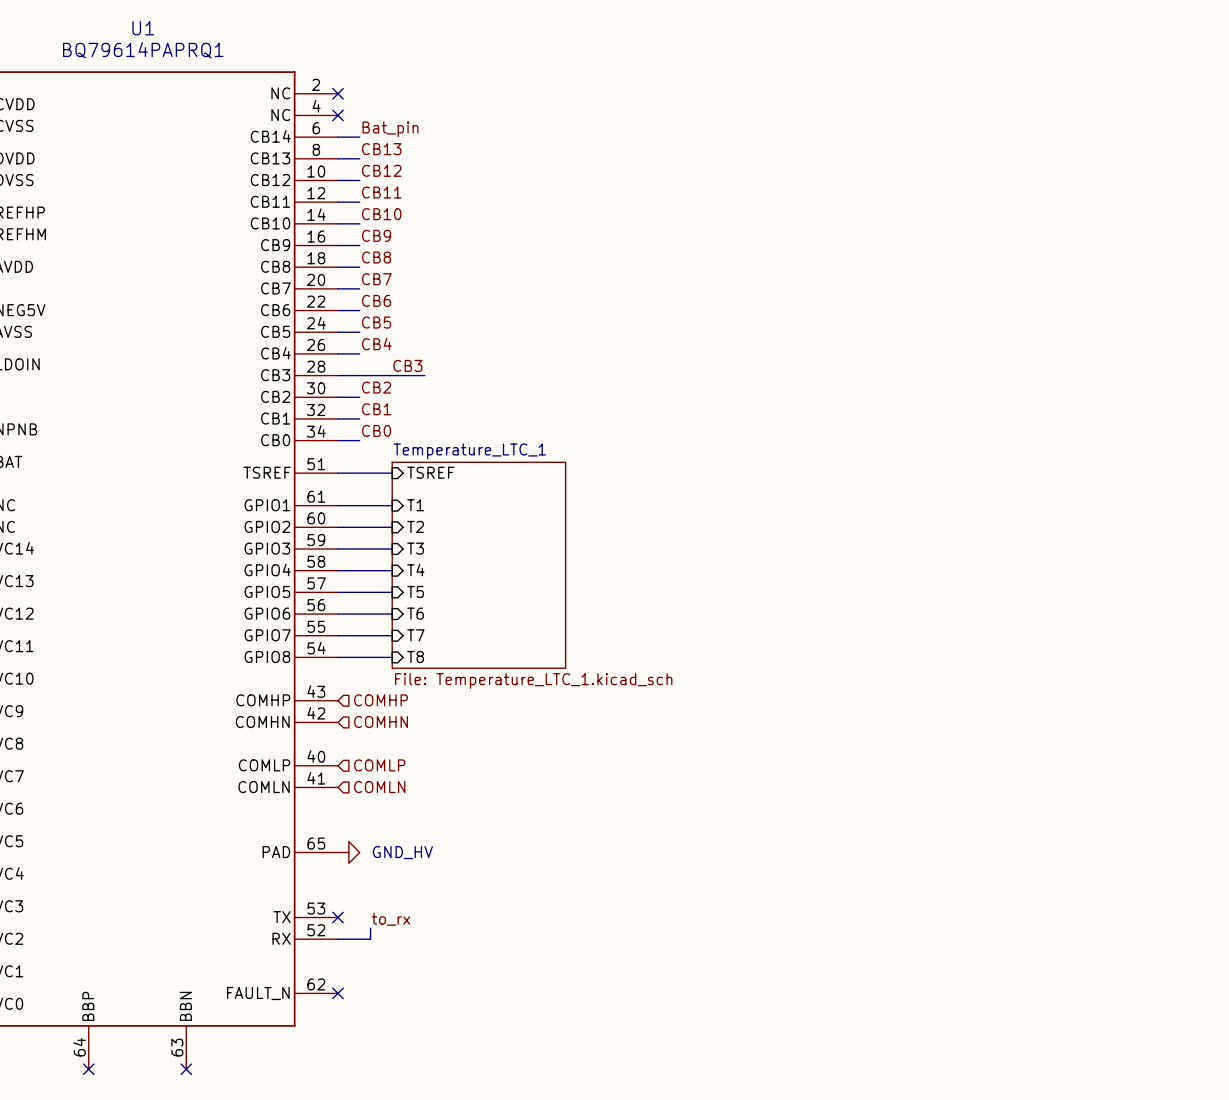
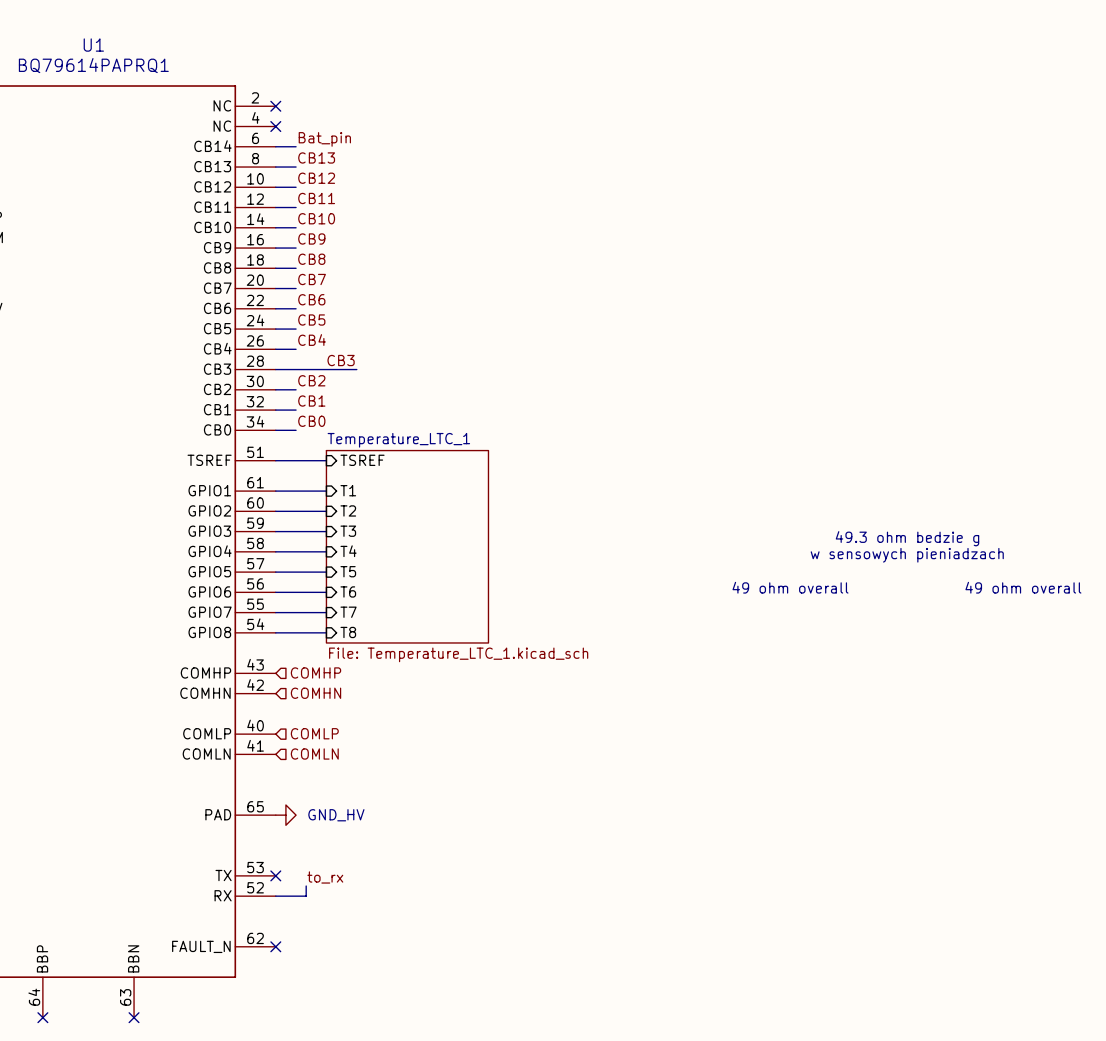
text: none -> 49.3 ohm bedzie g (907, 538)
text: none -> w sensowych pieniadzach (907, 555)
text: none -> 49 ohm overall (790, 587)
text: none -> 49 ohm overall (1023, 587)

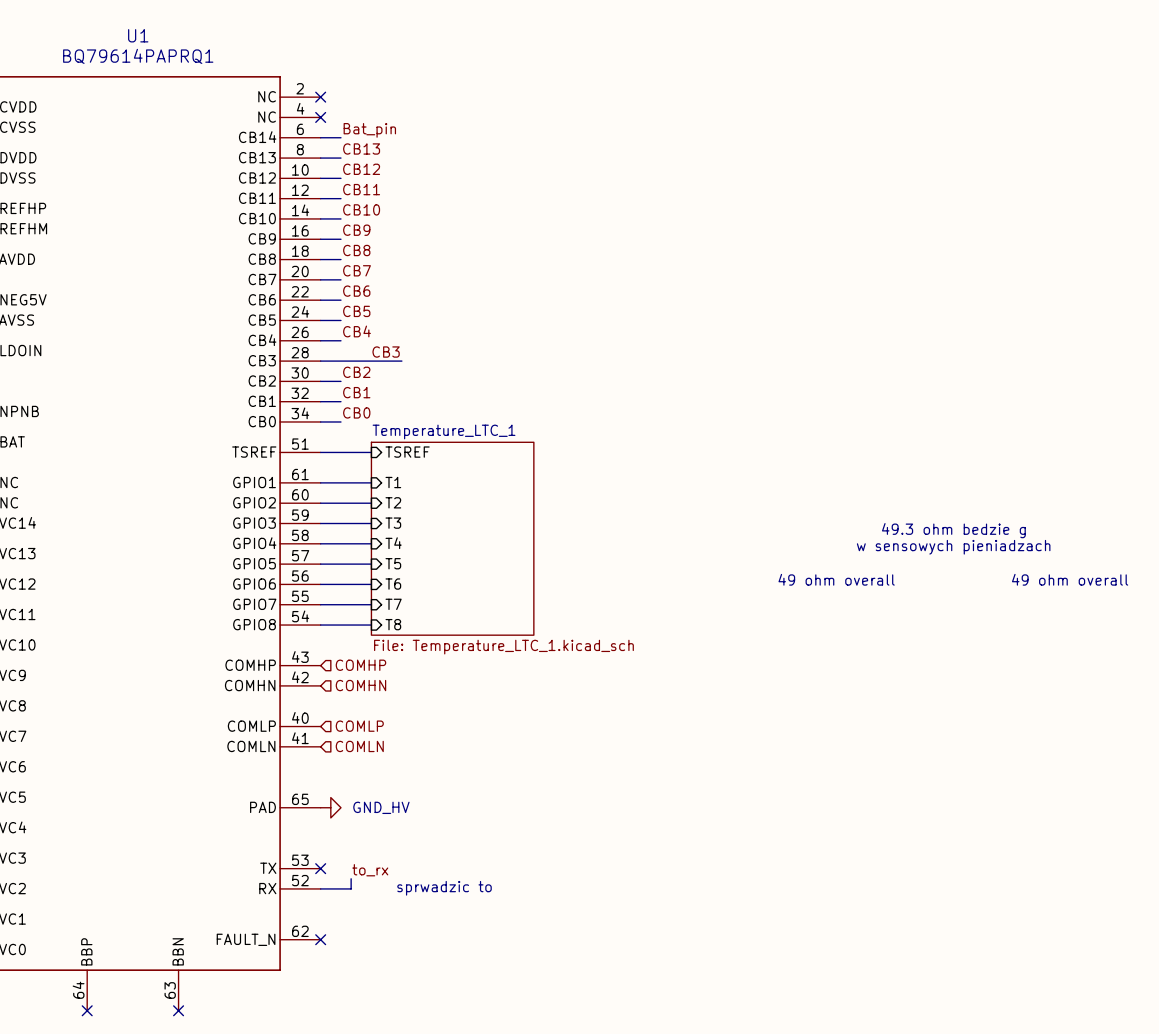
text: none -> sprwadzic to (444, 888)

